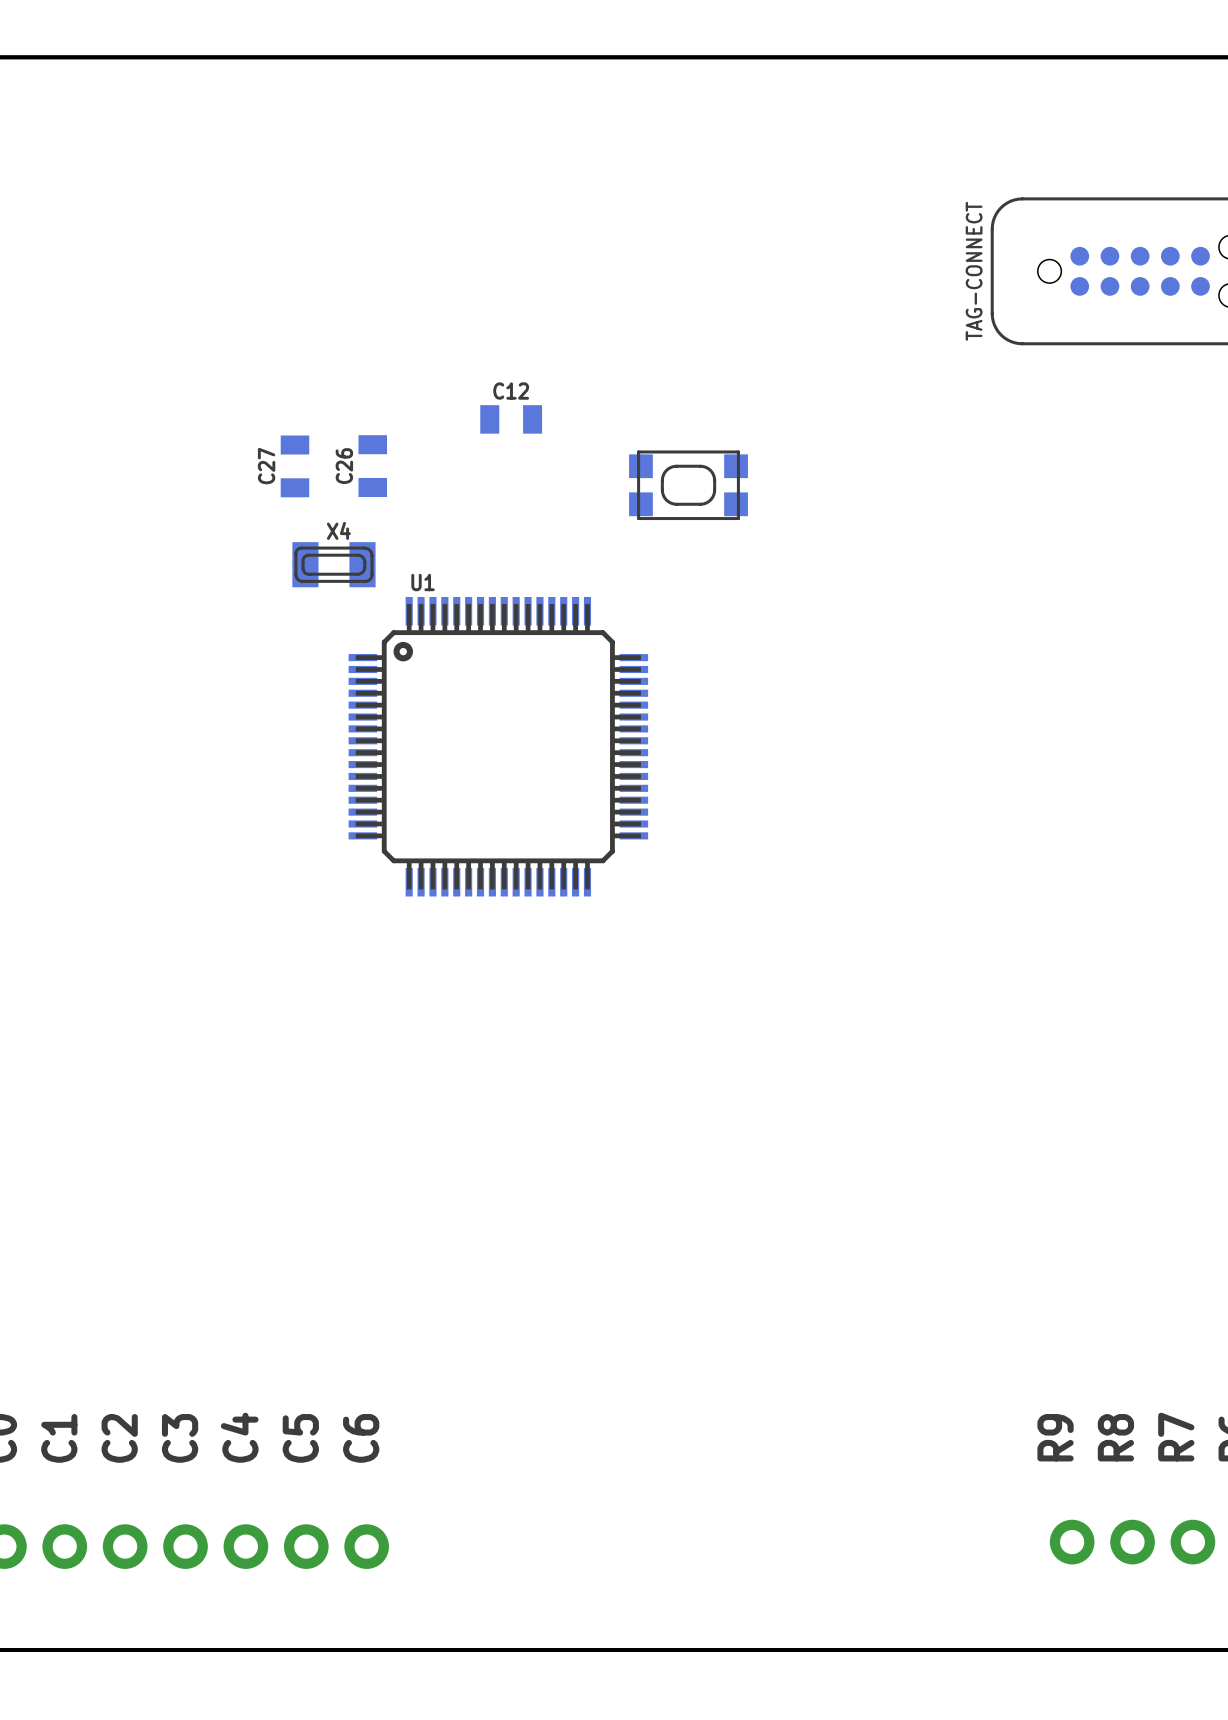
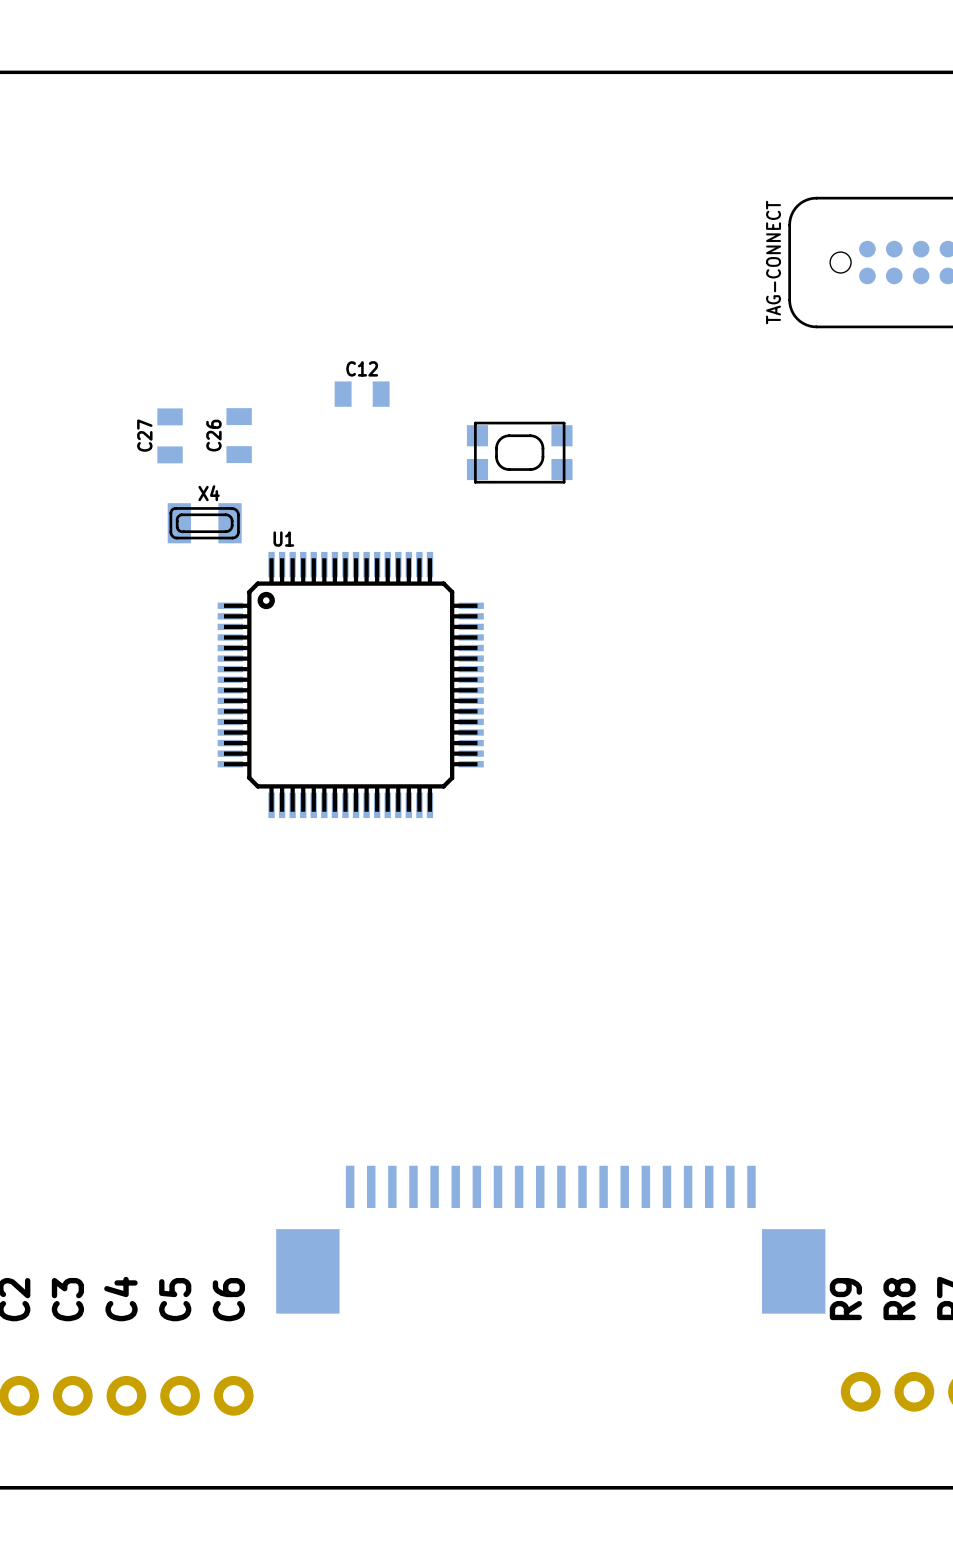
part: none -> (550, 1239)

